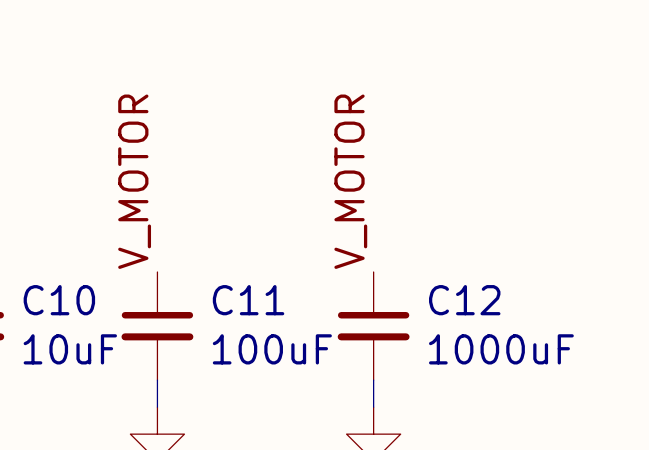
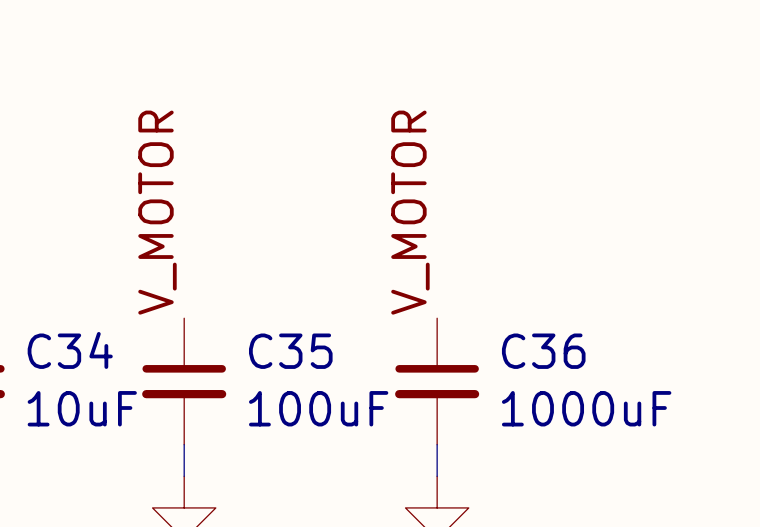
C10 name: C10 (59, 300) -> C34 (70, 350)
C11 name: C11 (248, 300) -> C35 (290, 351)
C12 name: C12 (464, 300) -> C36 (543, 351)

